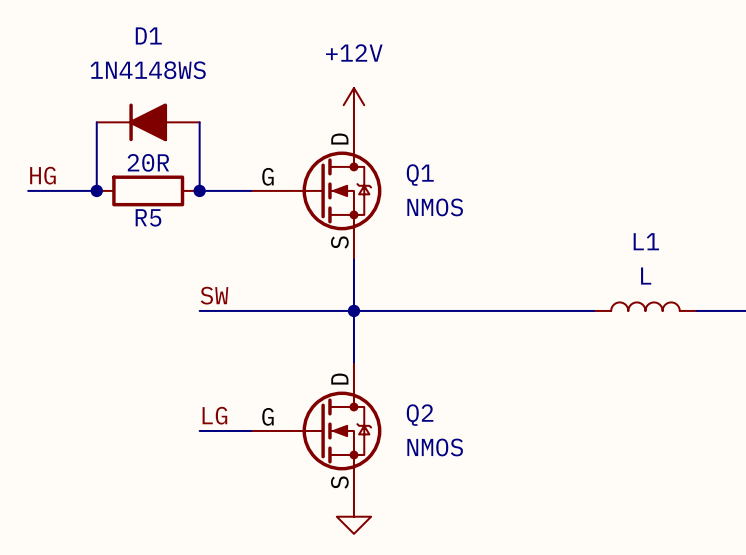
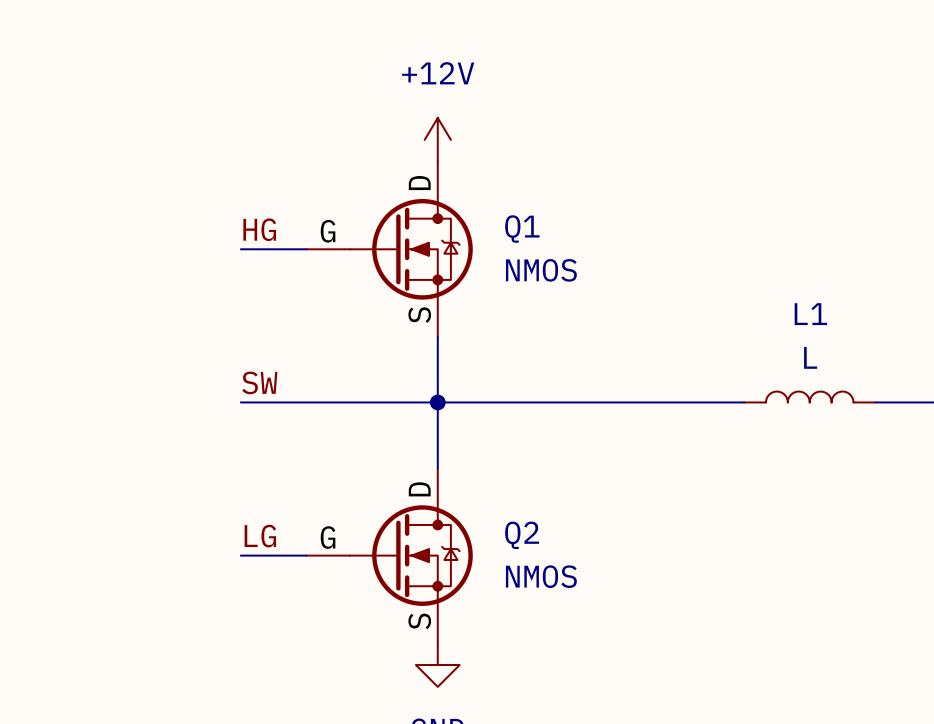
wire: (96, 122) (96, 190) (28, 190) -> none
D1: 1N4148WS (148, 122) -> none
wire: (199, 122) (199, 190) -> none
label position: HG (42, 175) -> HG (259, 229)
junction: (96, 190) -> none
R5: 20R (148, 190) -> none
junction: (199, 190) -> none

